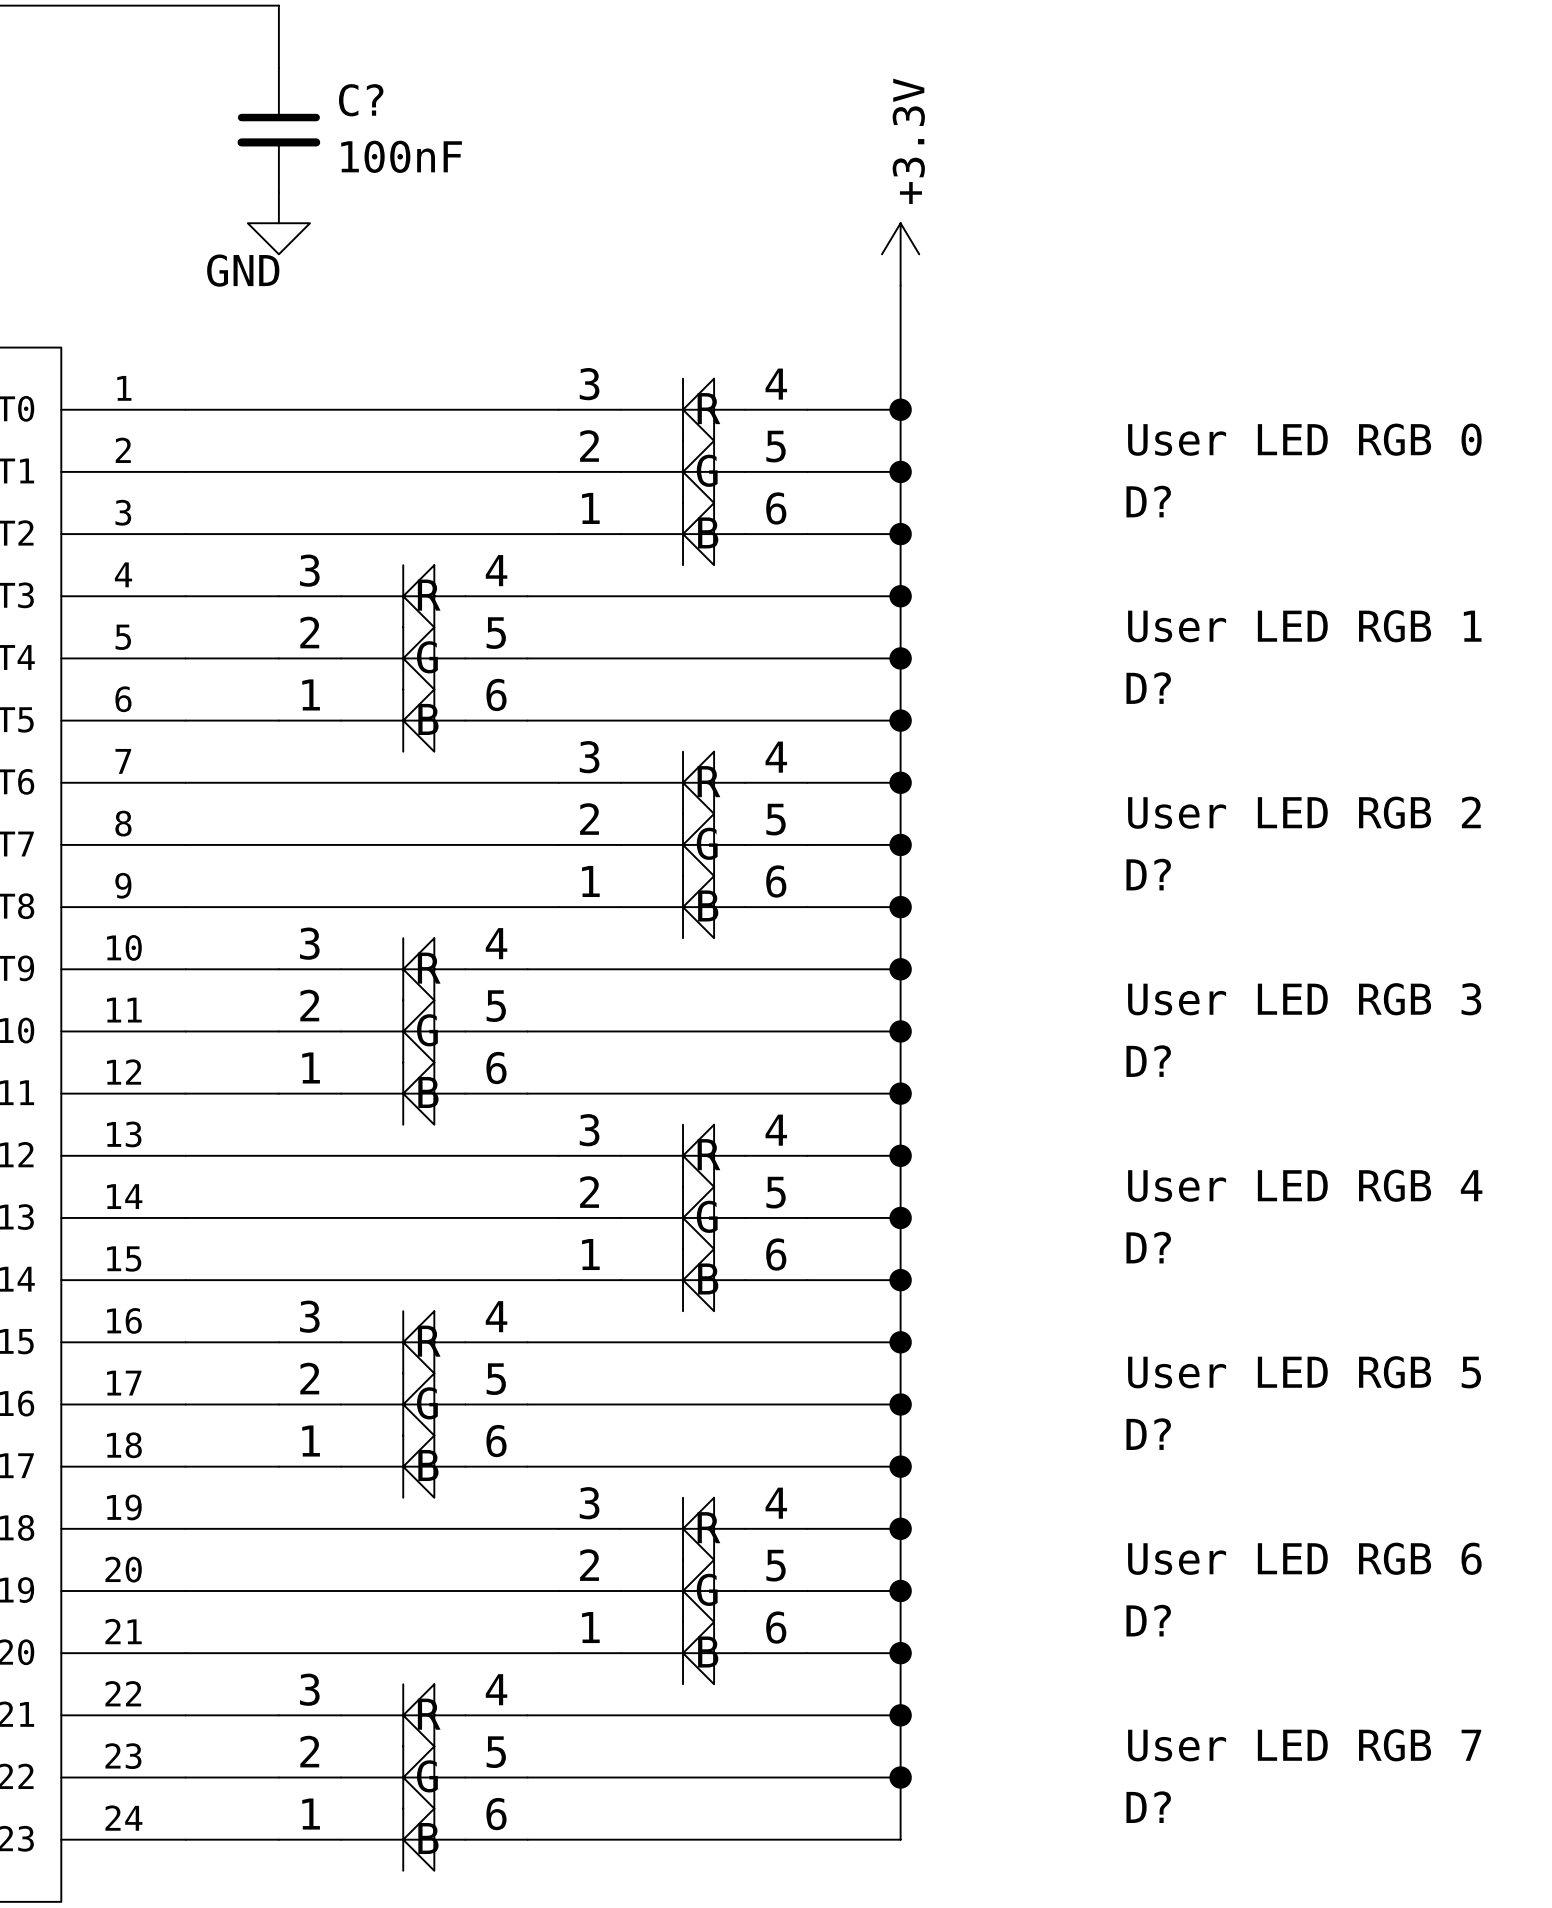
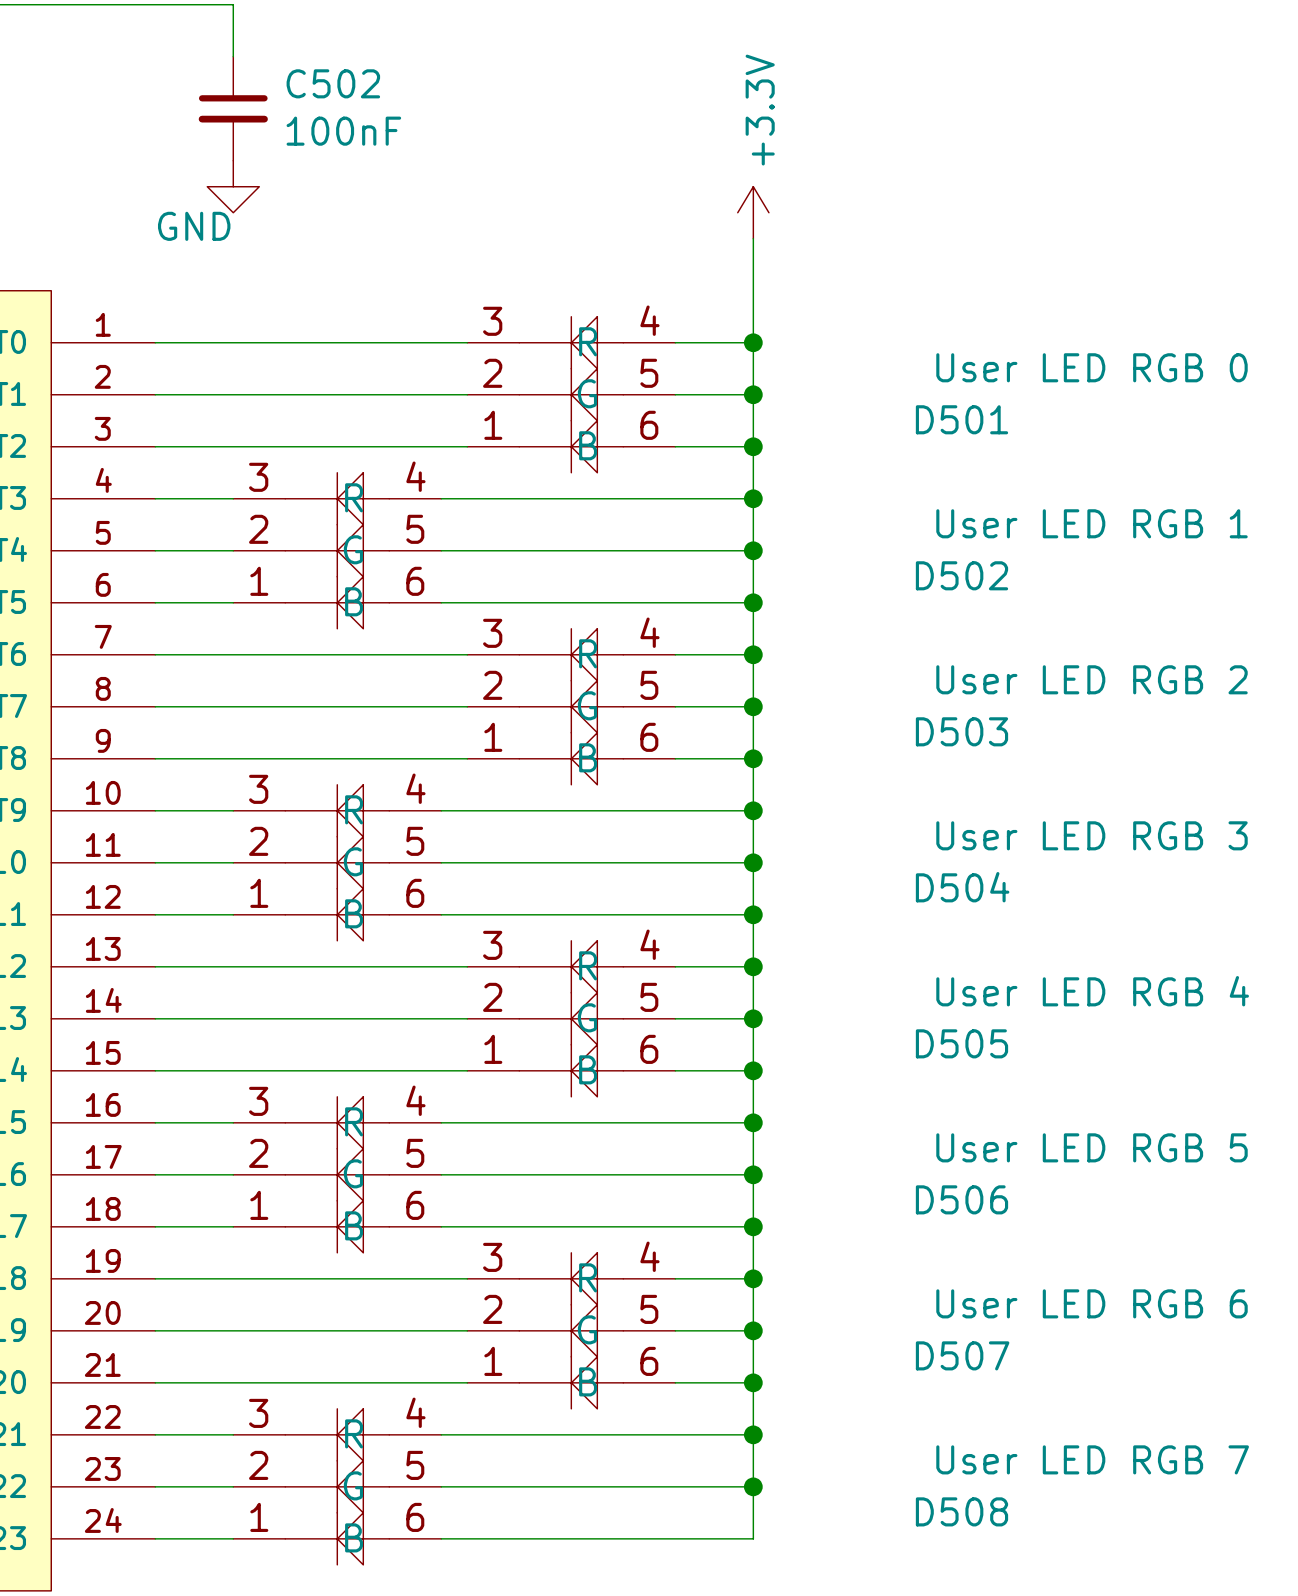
C? name: C? (361, 100) -> C502 (333, 83)
D? name: D? (1148, 501) -> D501 (961, 419)
D? name: D? (1148, 688) -> D502 (961, 575)
D? name: D? (1148, 874) -> D503 (961, 731)
D? name: D? (1148, 1061) -> D504 (962, 887)
D? name: D? (1148, 1247) -> D505 (961, 1043)
D? name: D? (1148, 1434) -> D506 (961, 1199)
D? name: D? (1148, 1620) -> D507 (962, 1355)
D? name: D? (1148, 1807) -> D508 (961, 1511)

